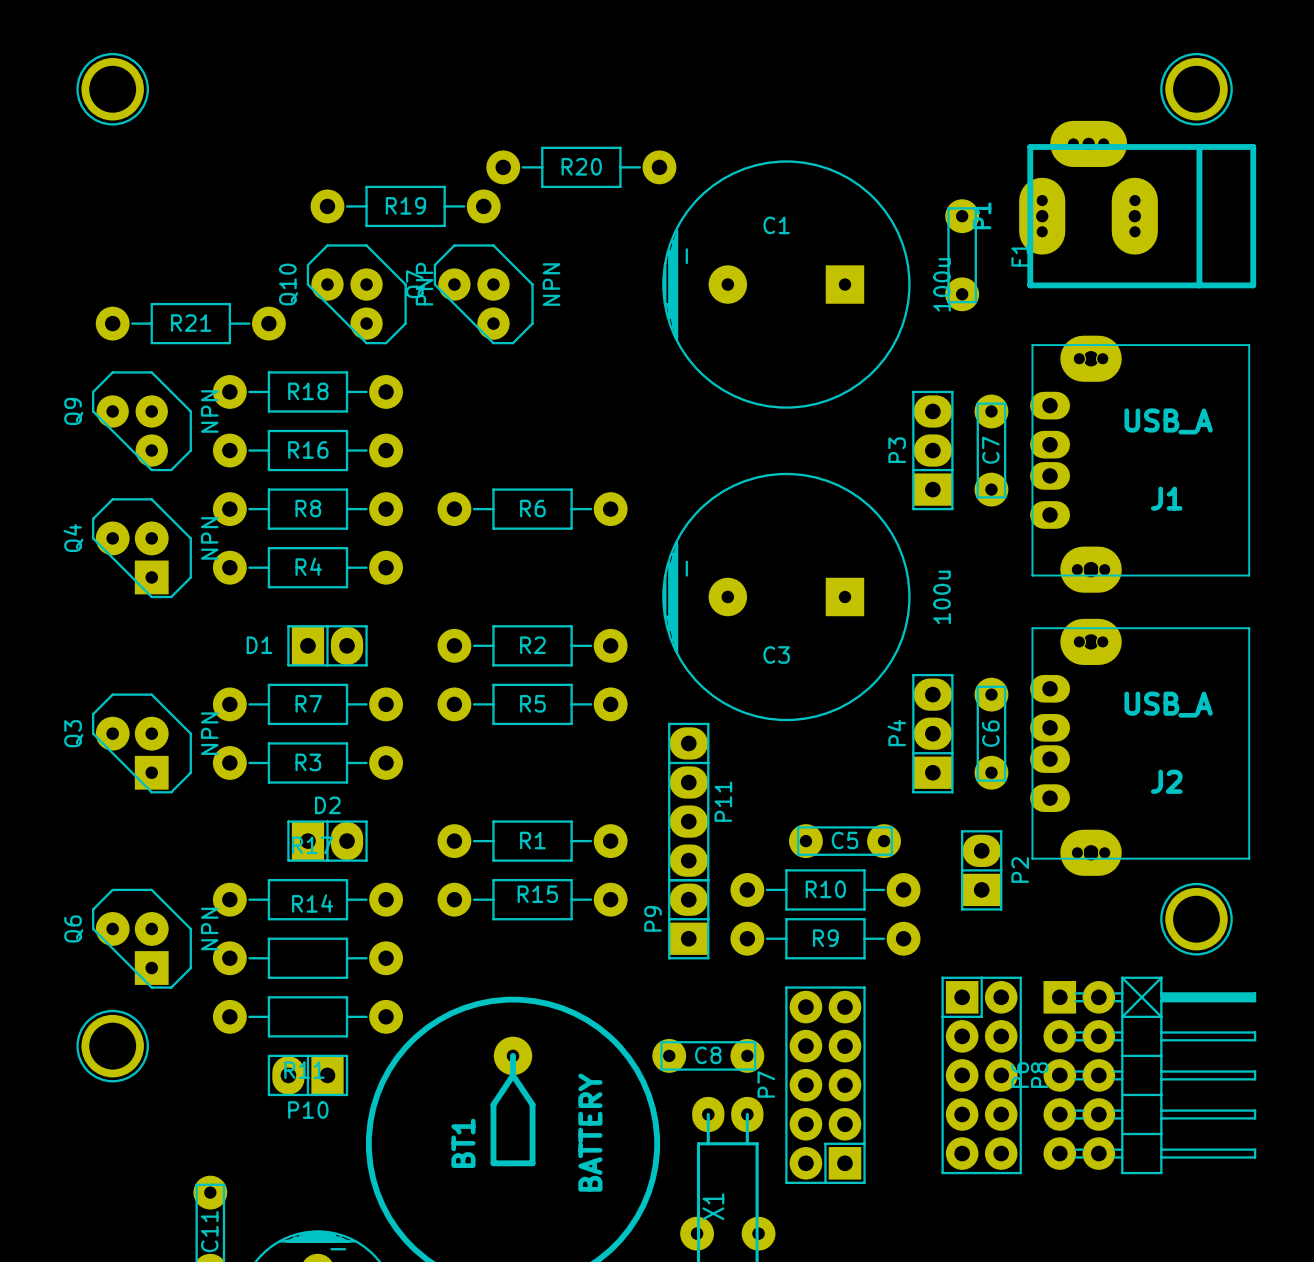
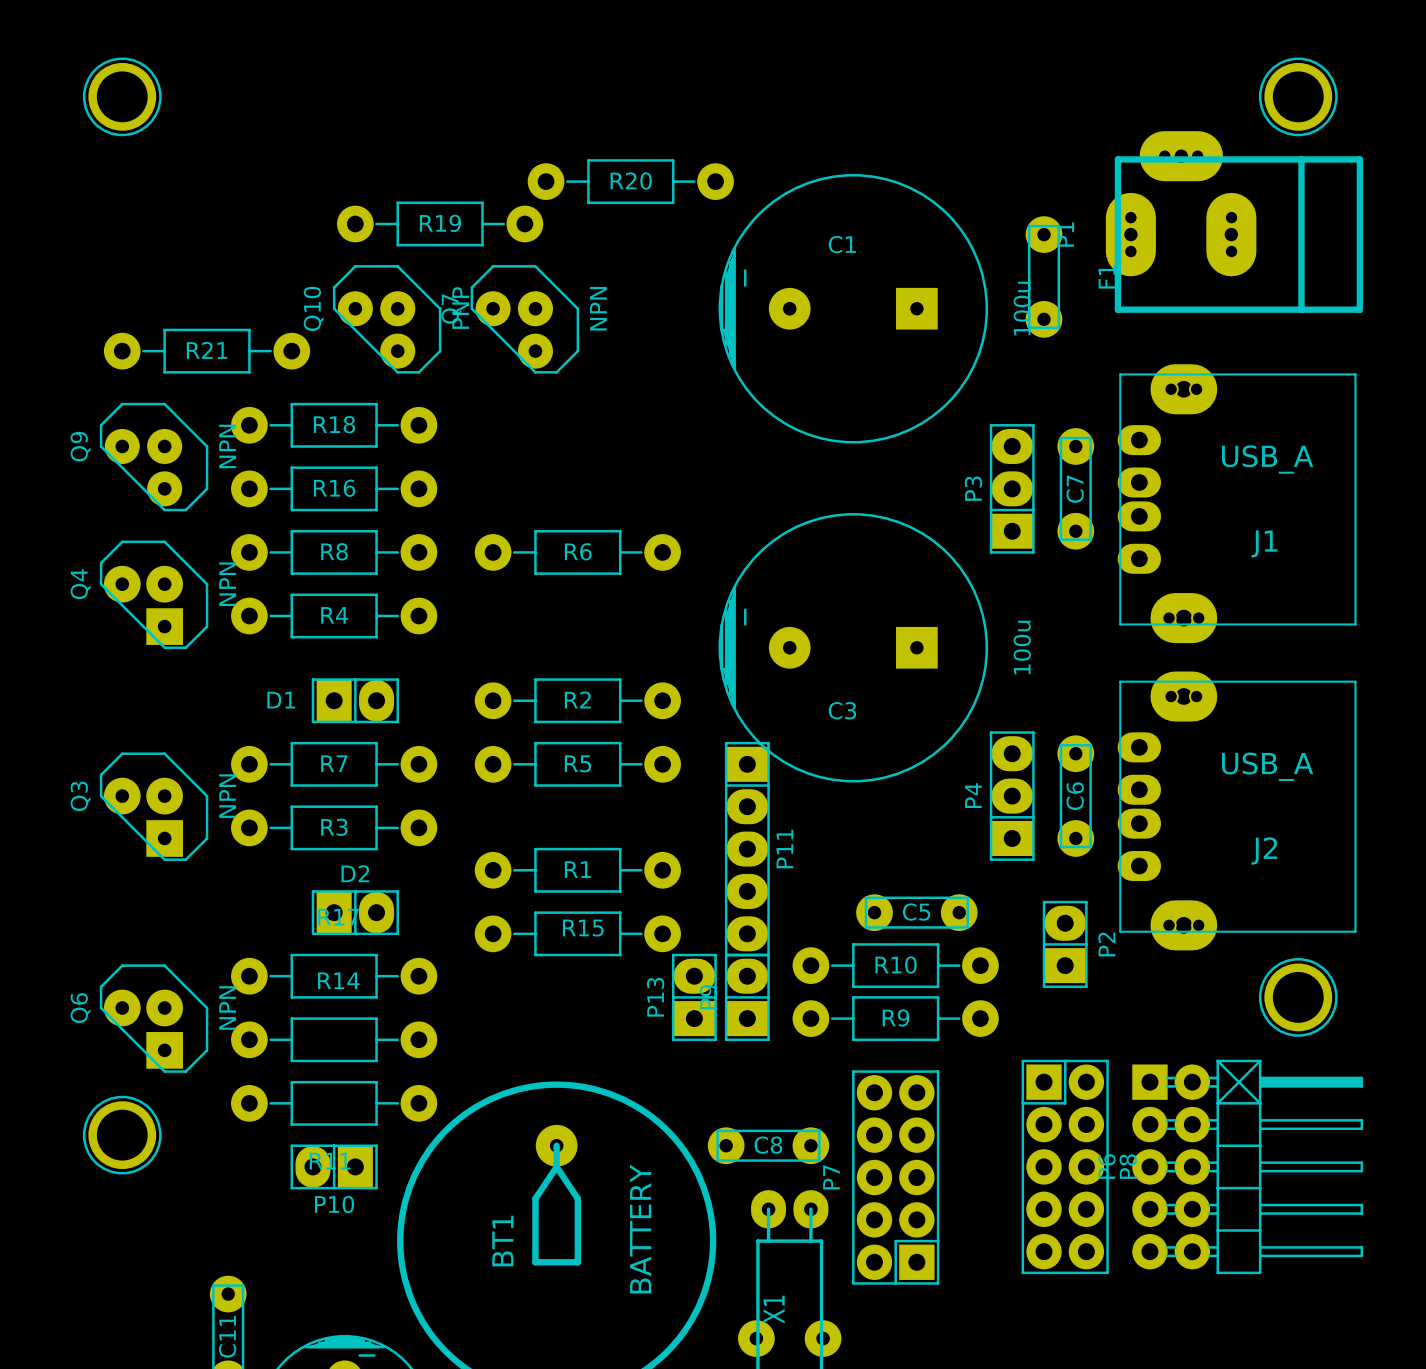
P11 footprint: [668, 722, 710, 882] -> [724, 741, 770, 957]
R1 position: (532, 841) -> (577, 870)
R15 position: (532, 899) -> (577, 933)
P13: none -> (694, 997)

